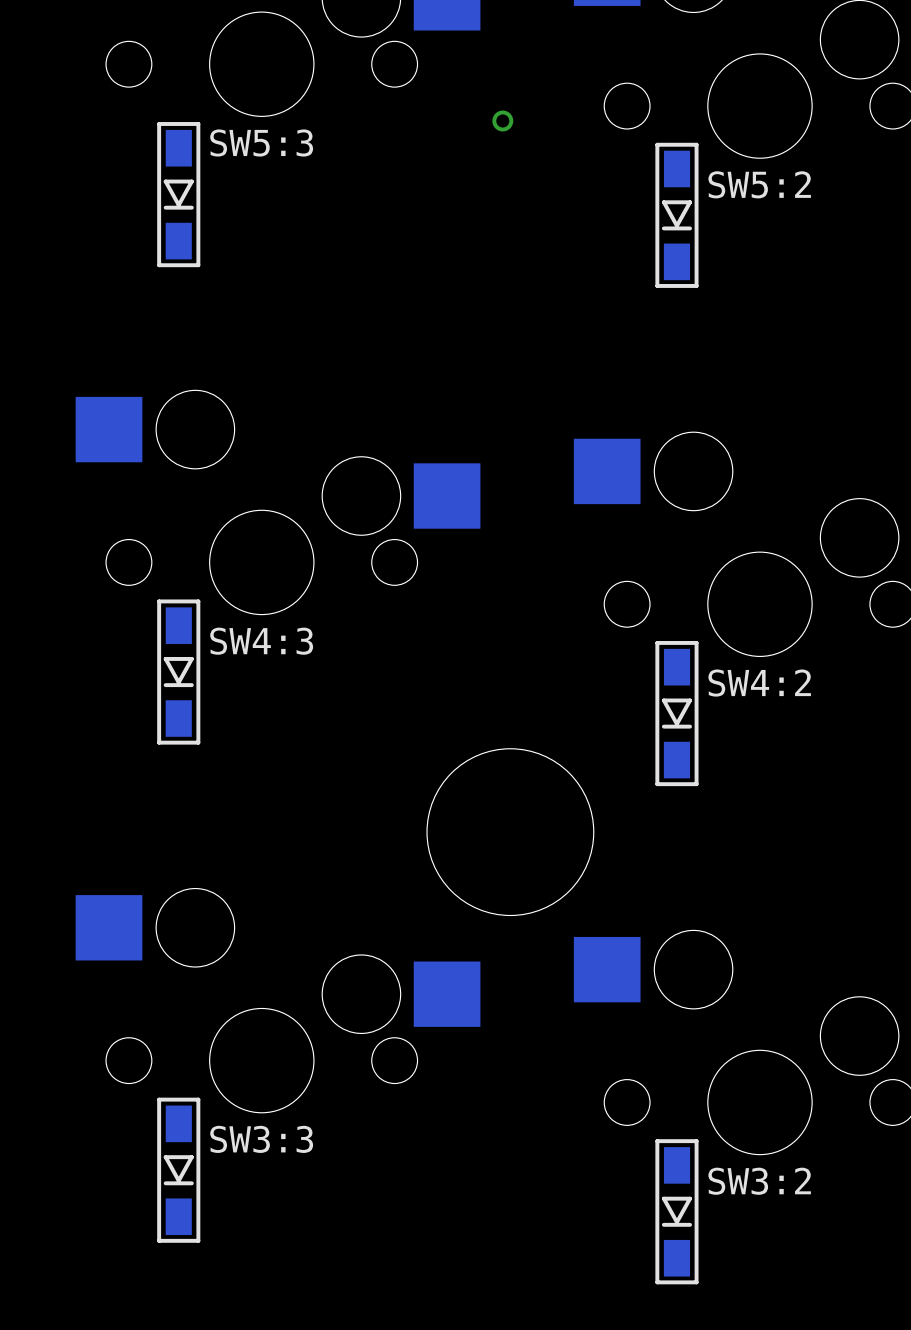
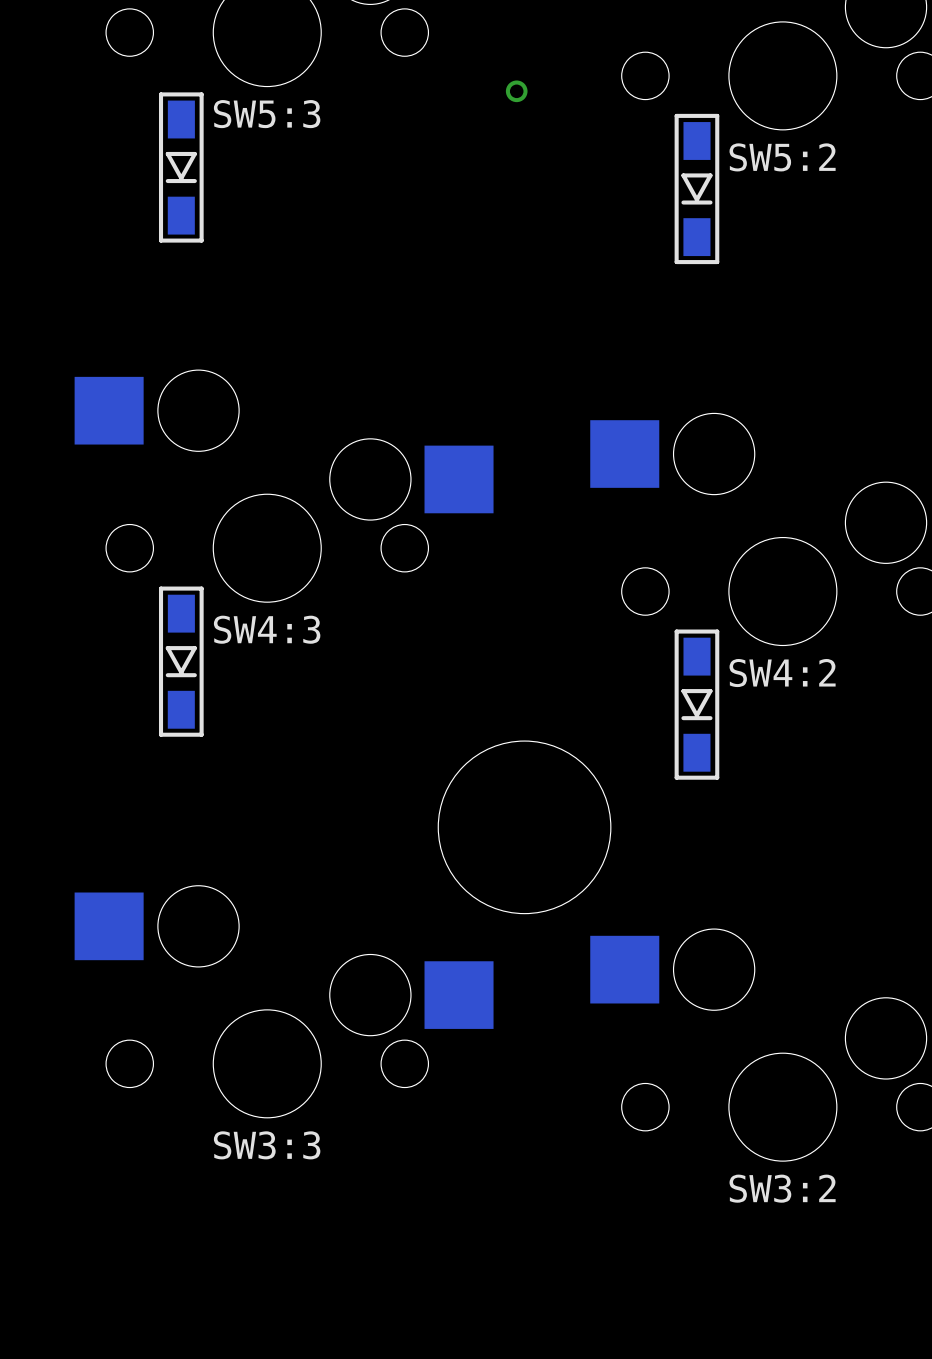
part: (178, 1170) -> none
part: (676, 1211) -> none

